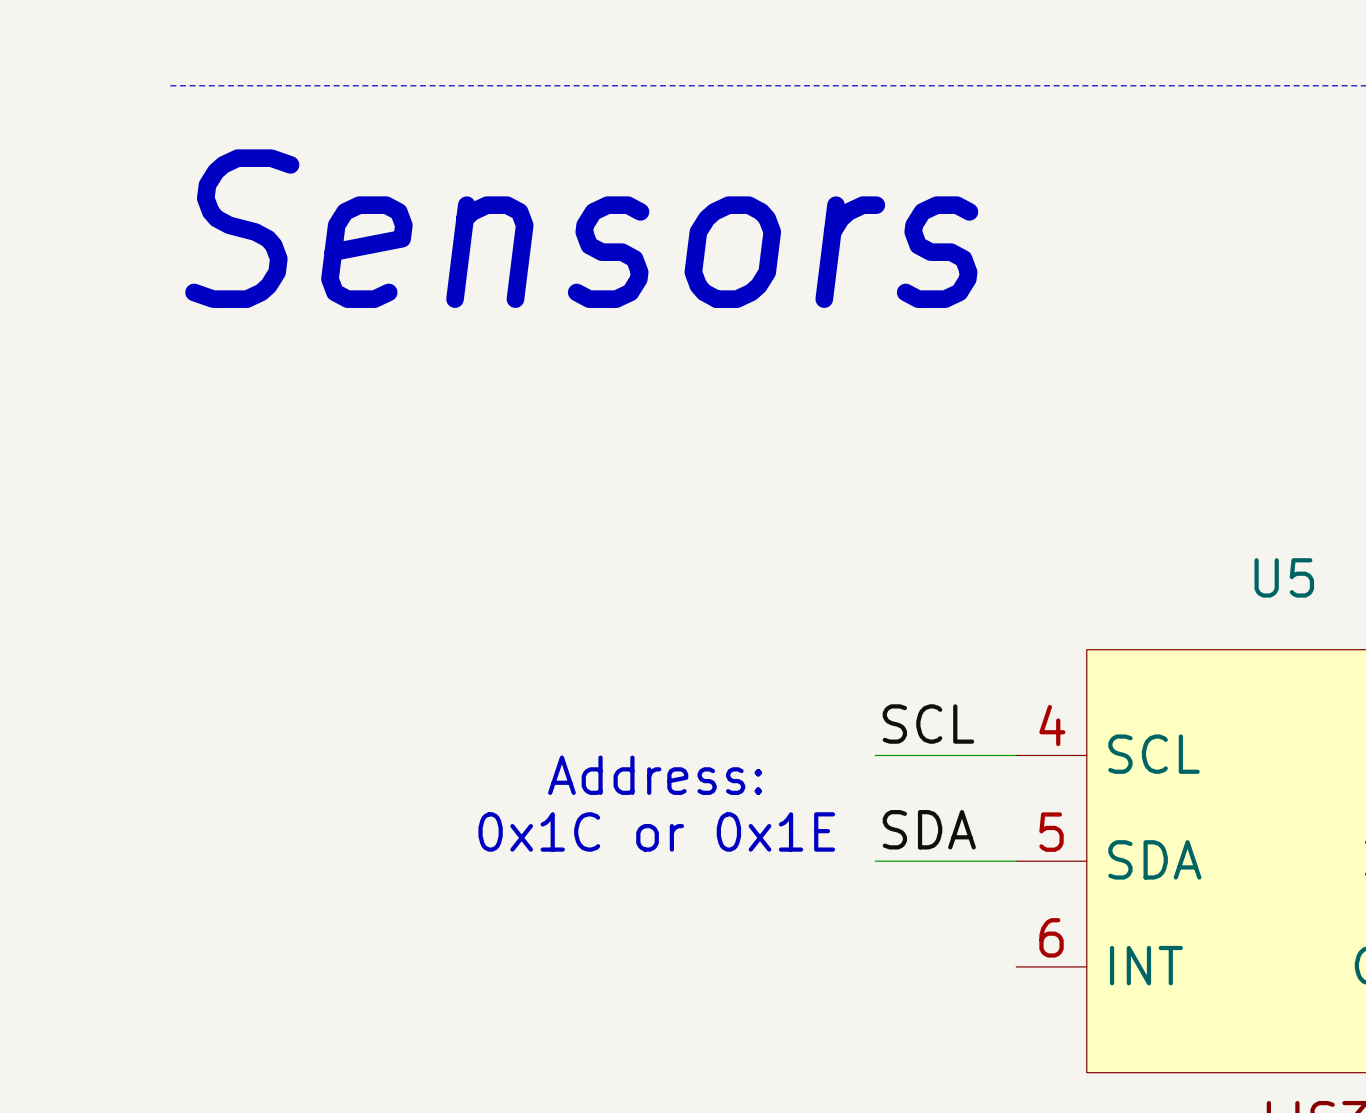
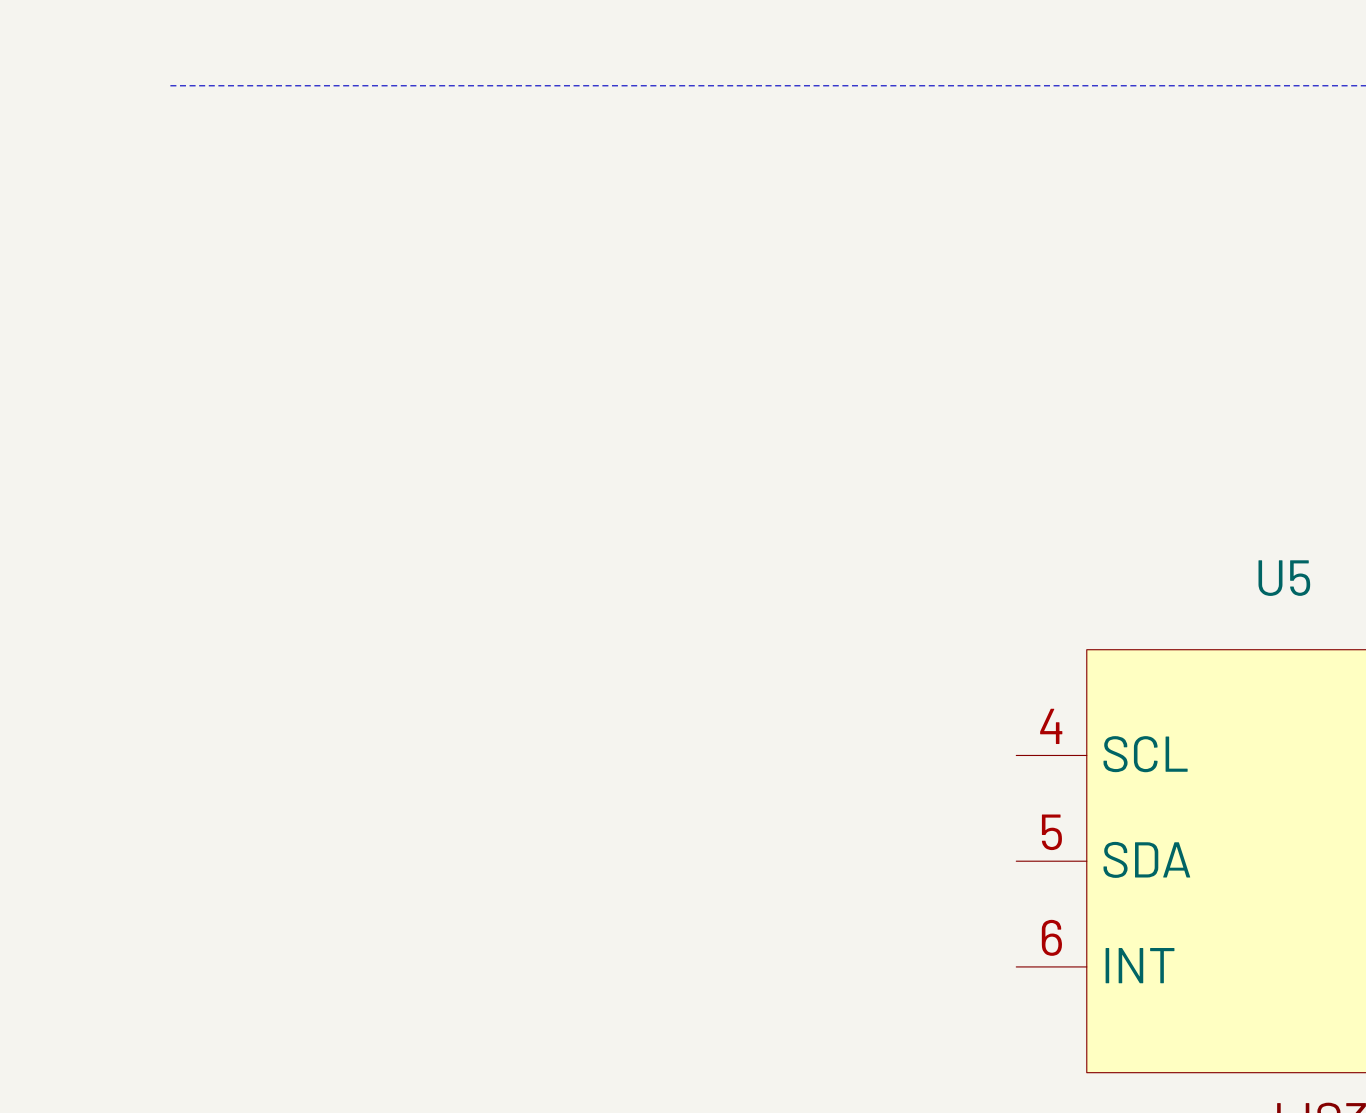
text: Sensors (581, 228) -> none
label: SCL (928, 724) -> none
wire: (875, 755) (1016, 755) -> none
text: Address: (655, 775) -> none
label: SDA (929, 829) -> none
text: 0x1C or 0x1E (656, 831) -> none
wire: (875, 861) (1016, 861) -> none

